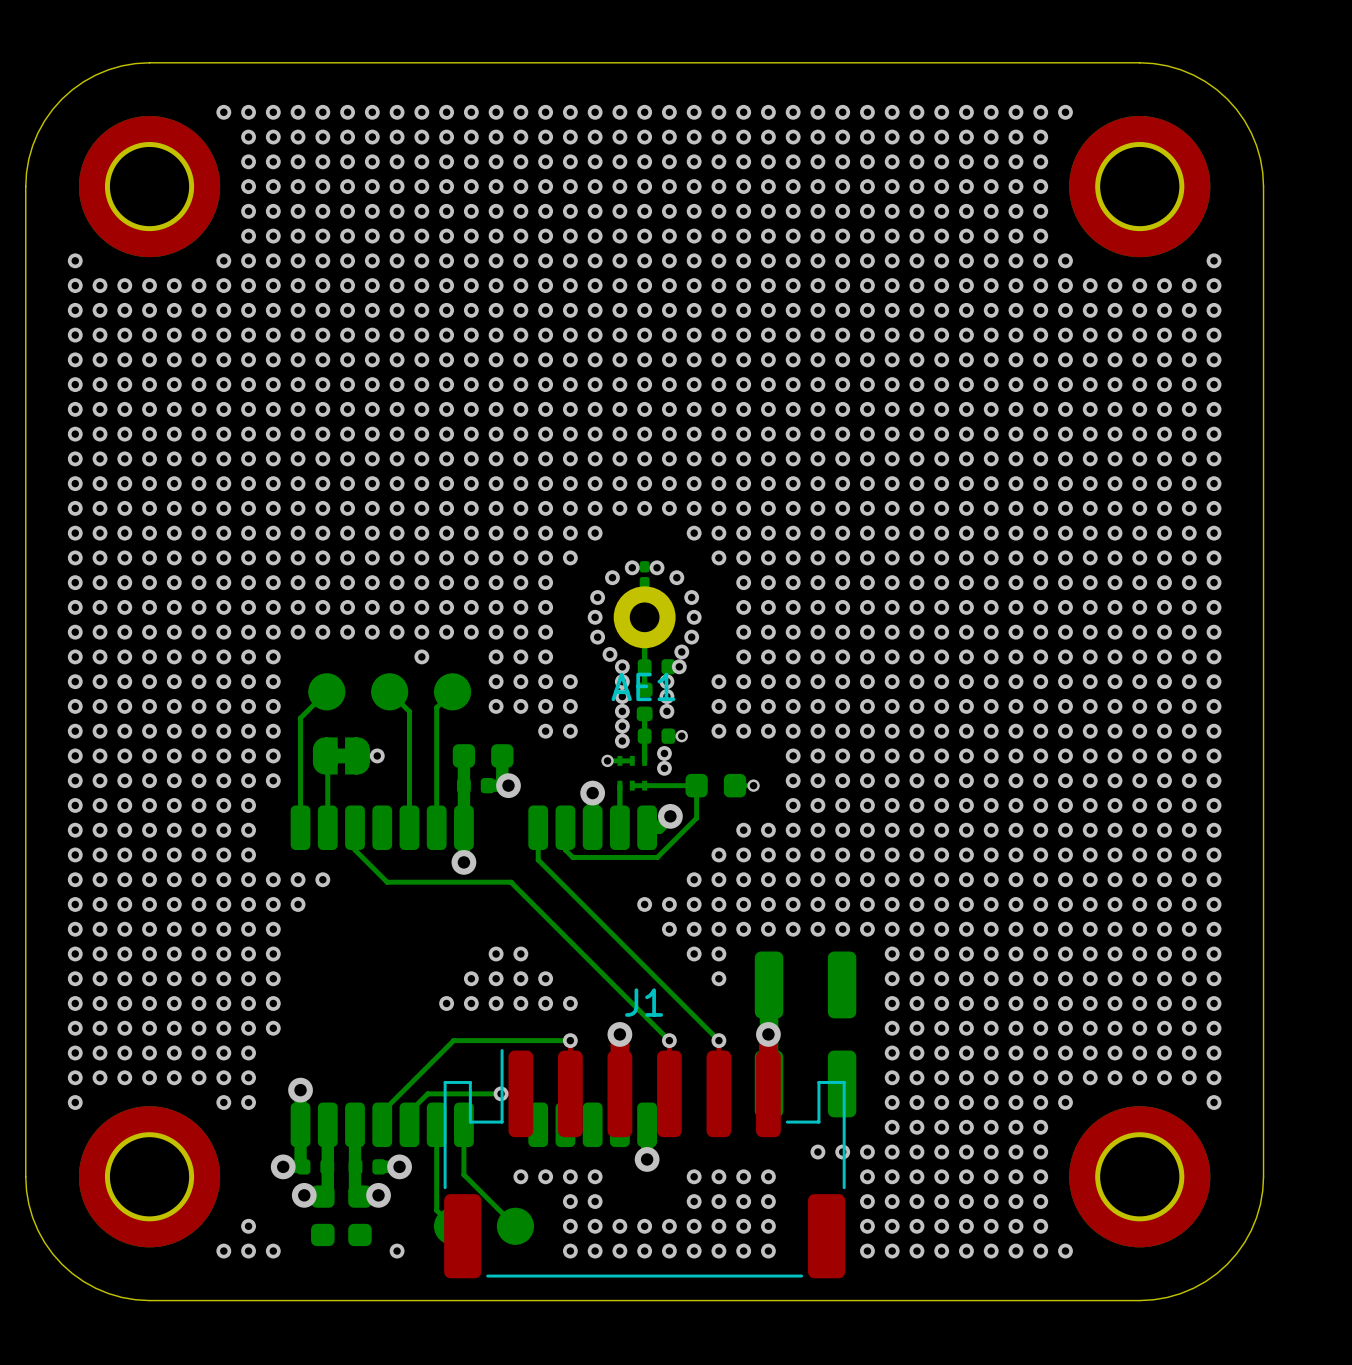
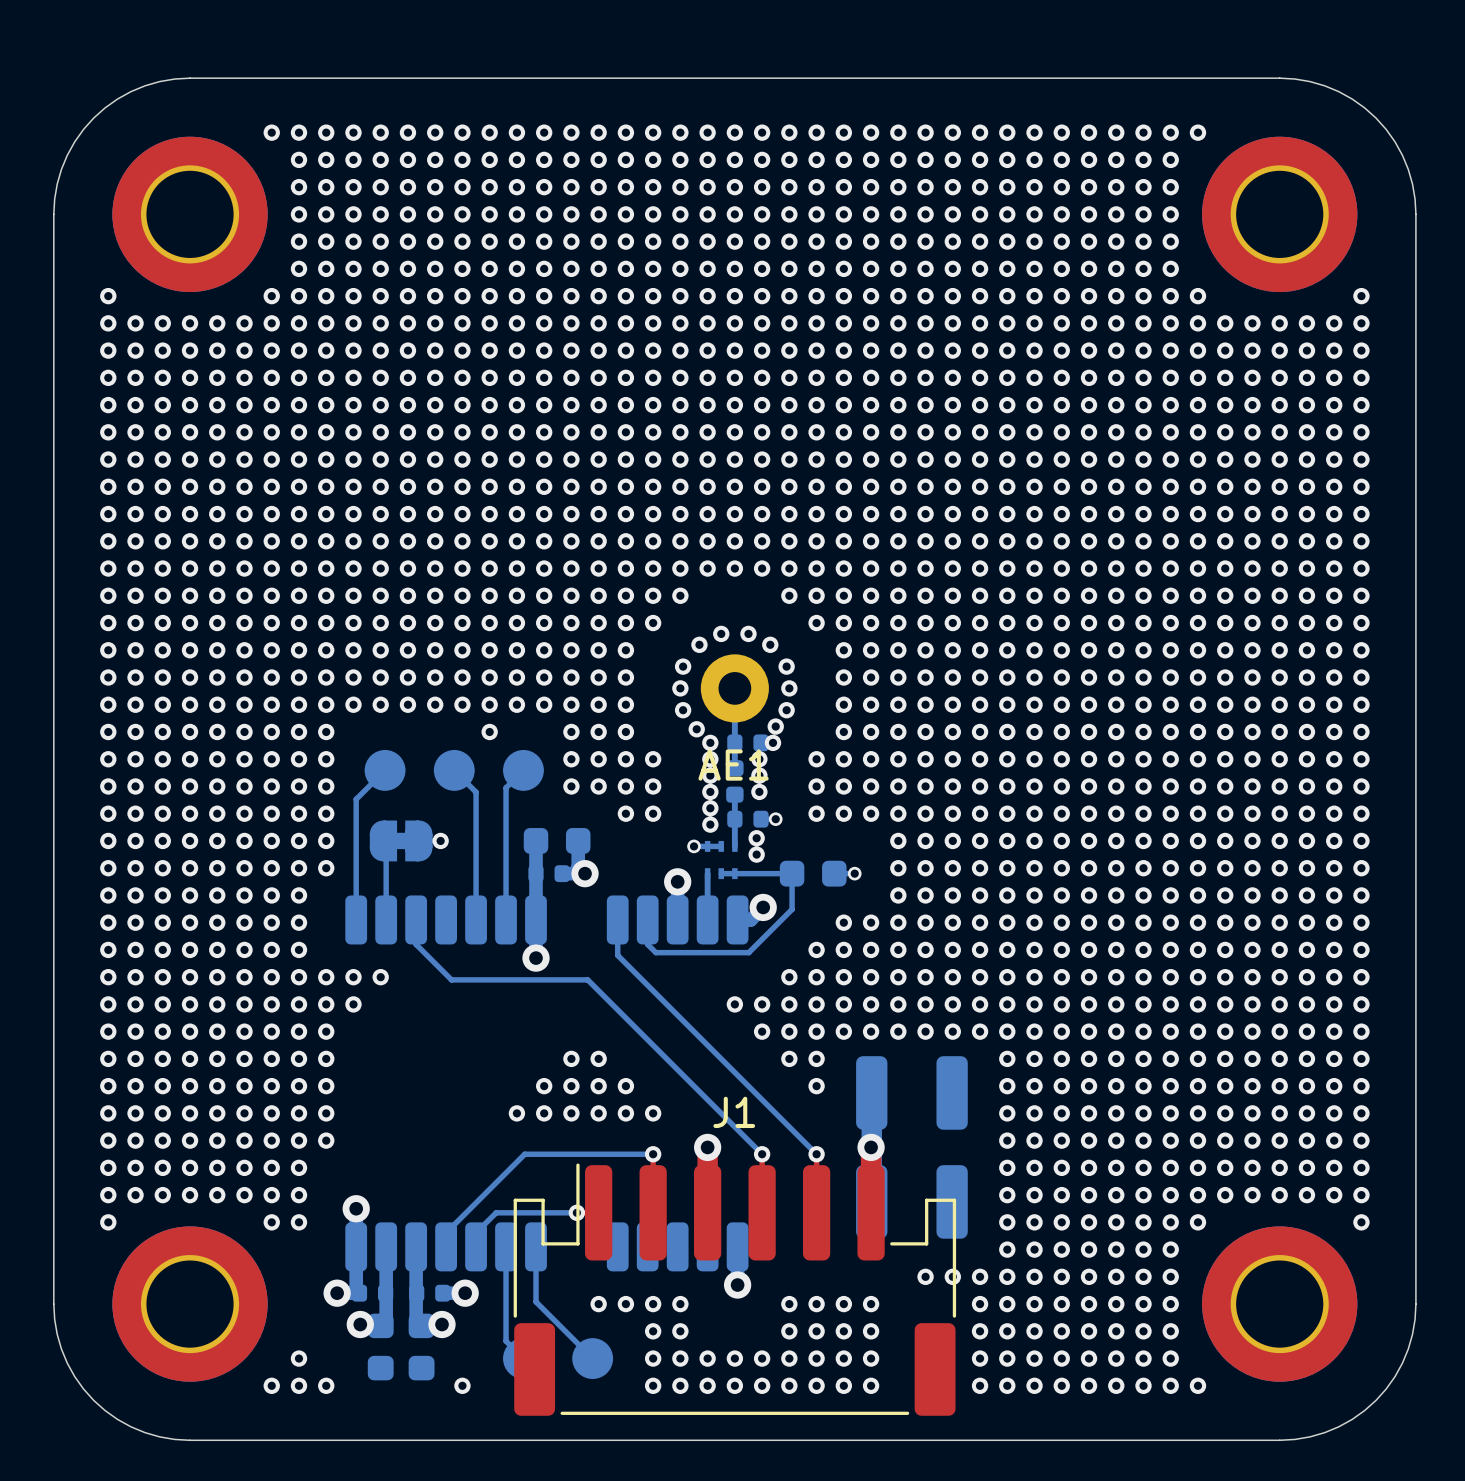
part: (644, 574) -> none

